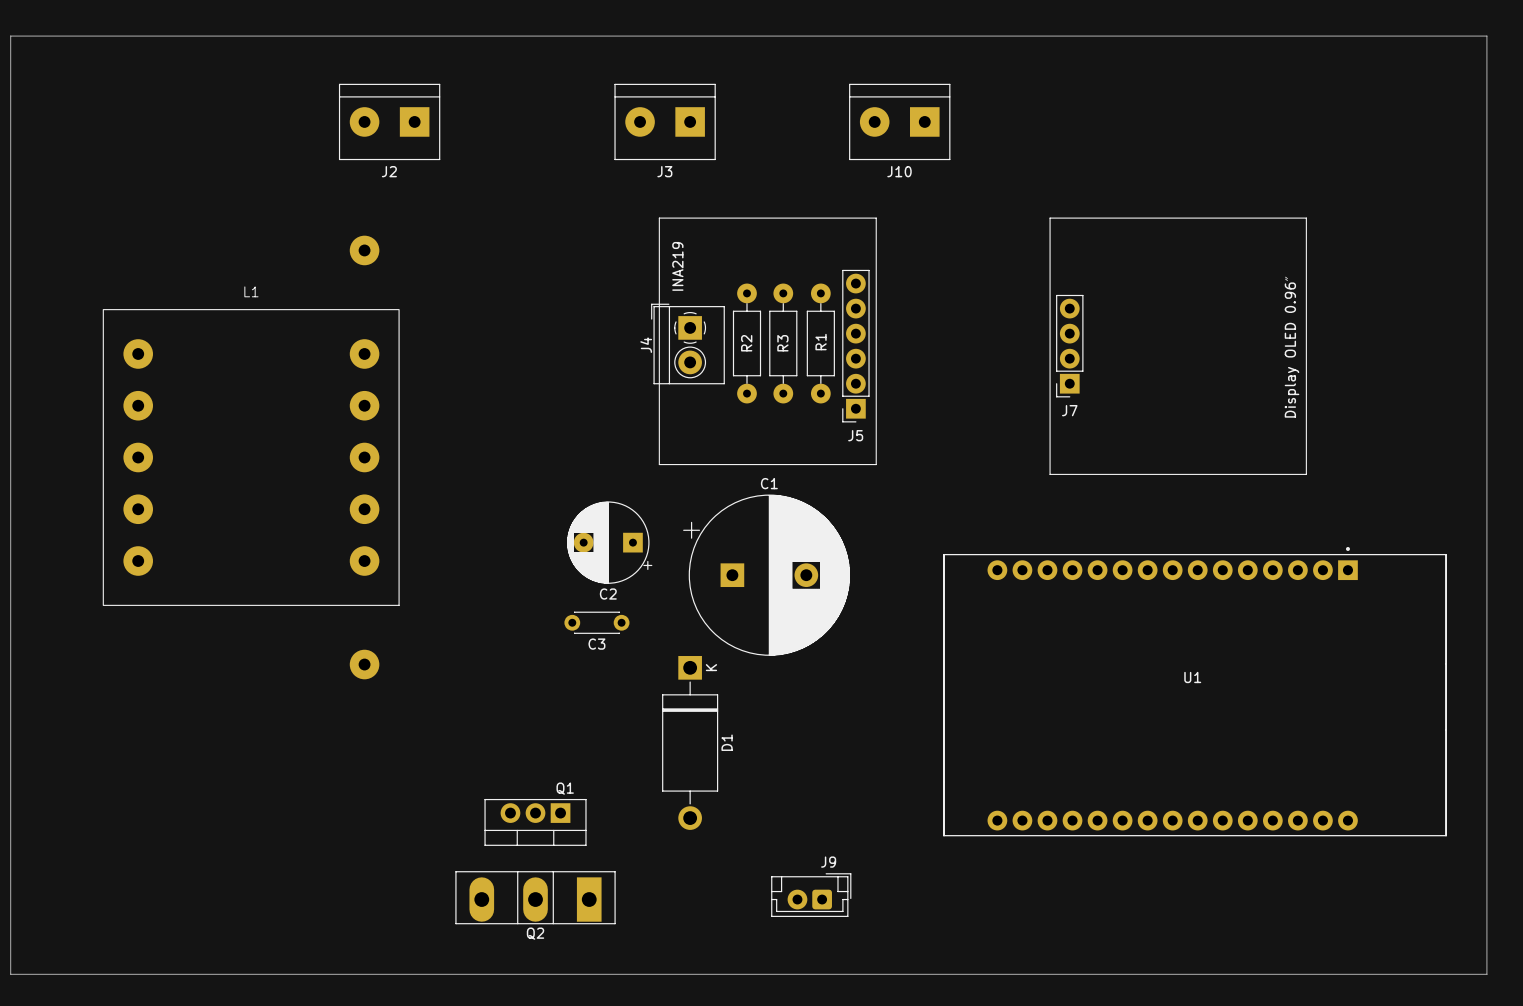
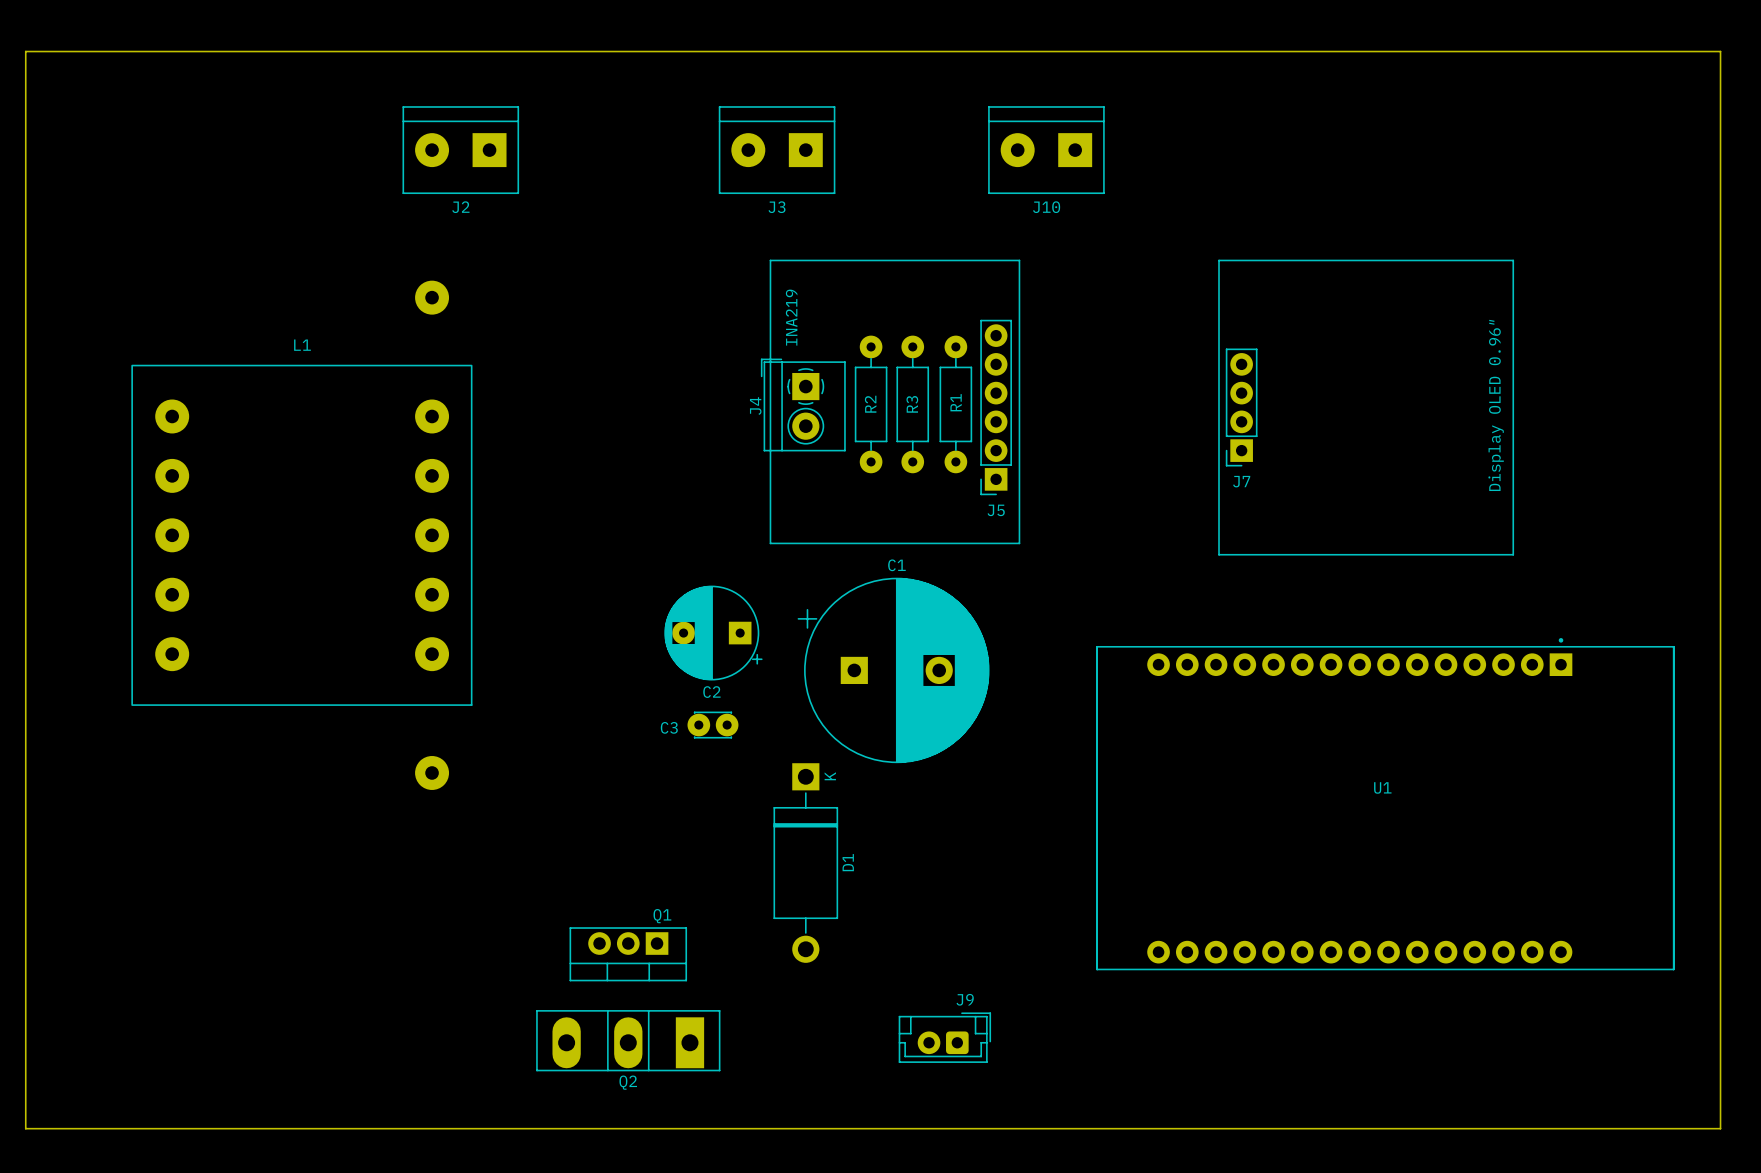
C3 footprint: [564, 611, 630, 634] -> [687, 711, 739, 739]
C3 name position: C3 (596, 644) -> C3 (669, 727)

